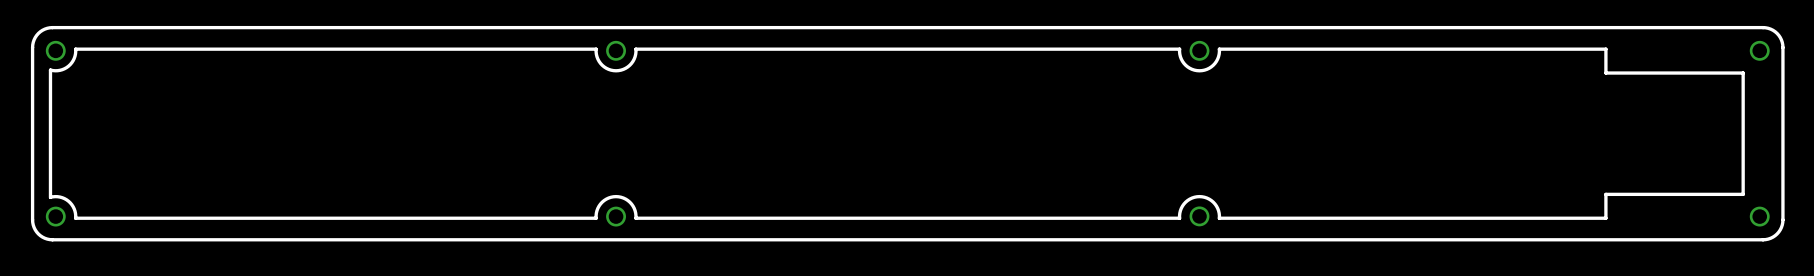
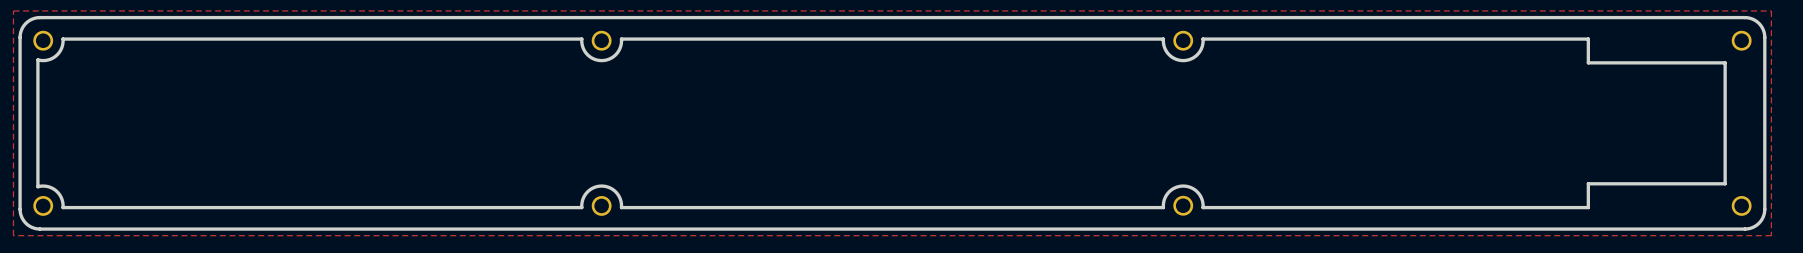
zone outline: none -> (13, 10) (13, 235) (1771, 235) (1771, 10) (13, 10)

